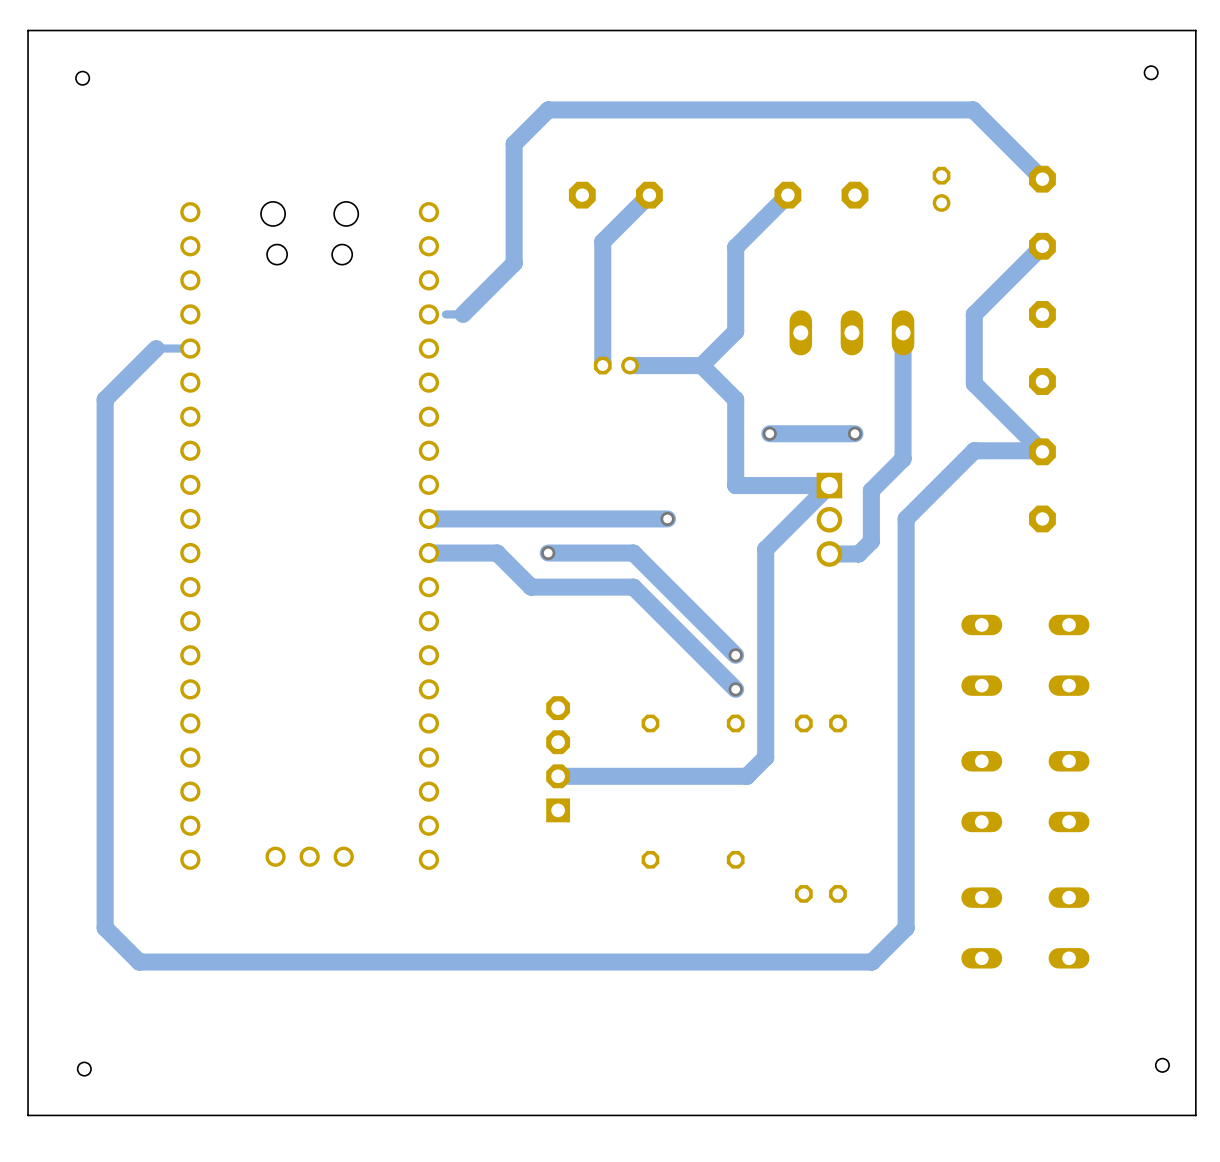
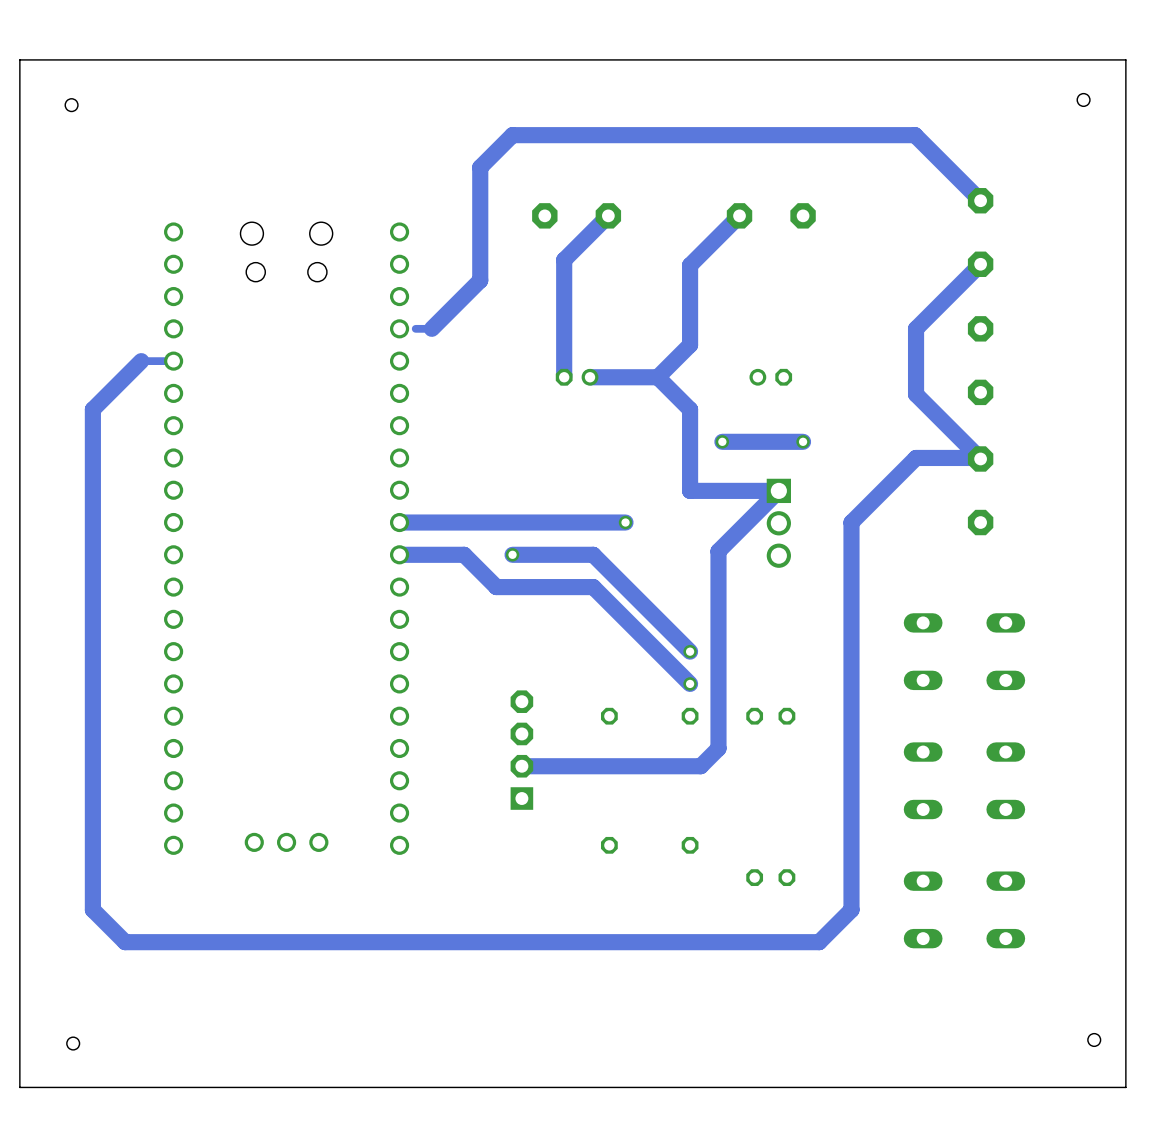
part rotation: 0° (941, 189) -> 90° clockwise (770, 377)
part position: (941, 189) -> (770, 377)
part: (851, 332) -> none
track: (903, 332) (903, 458) (871, 490) (871, 541) (858, 553) (829, 553) -> none

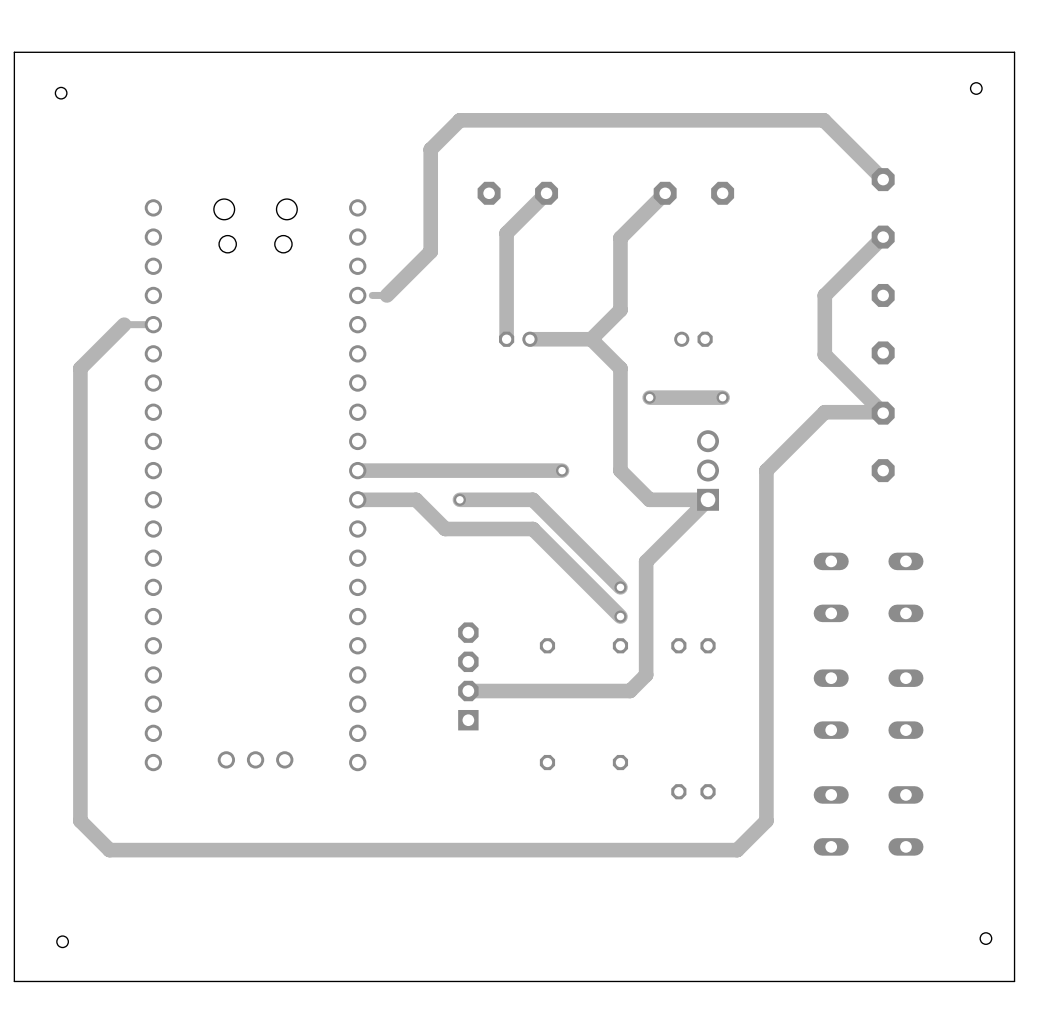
track: (690, 490) (778, 490) (718, 551) (718, 623) -> (620, 442) (620, 470) (649, 499) (708, 499) (646, 561)
part rotation: 0° (778, 523) -> 180° (708, 470)

